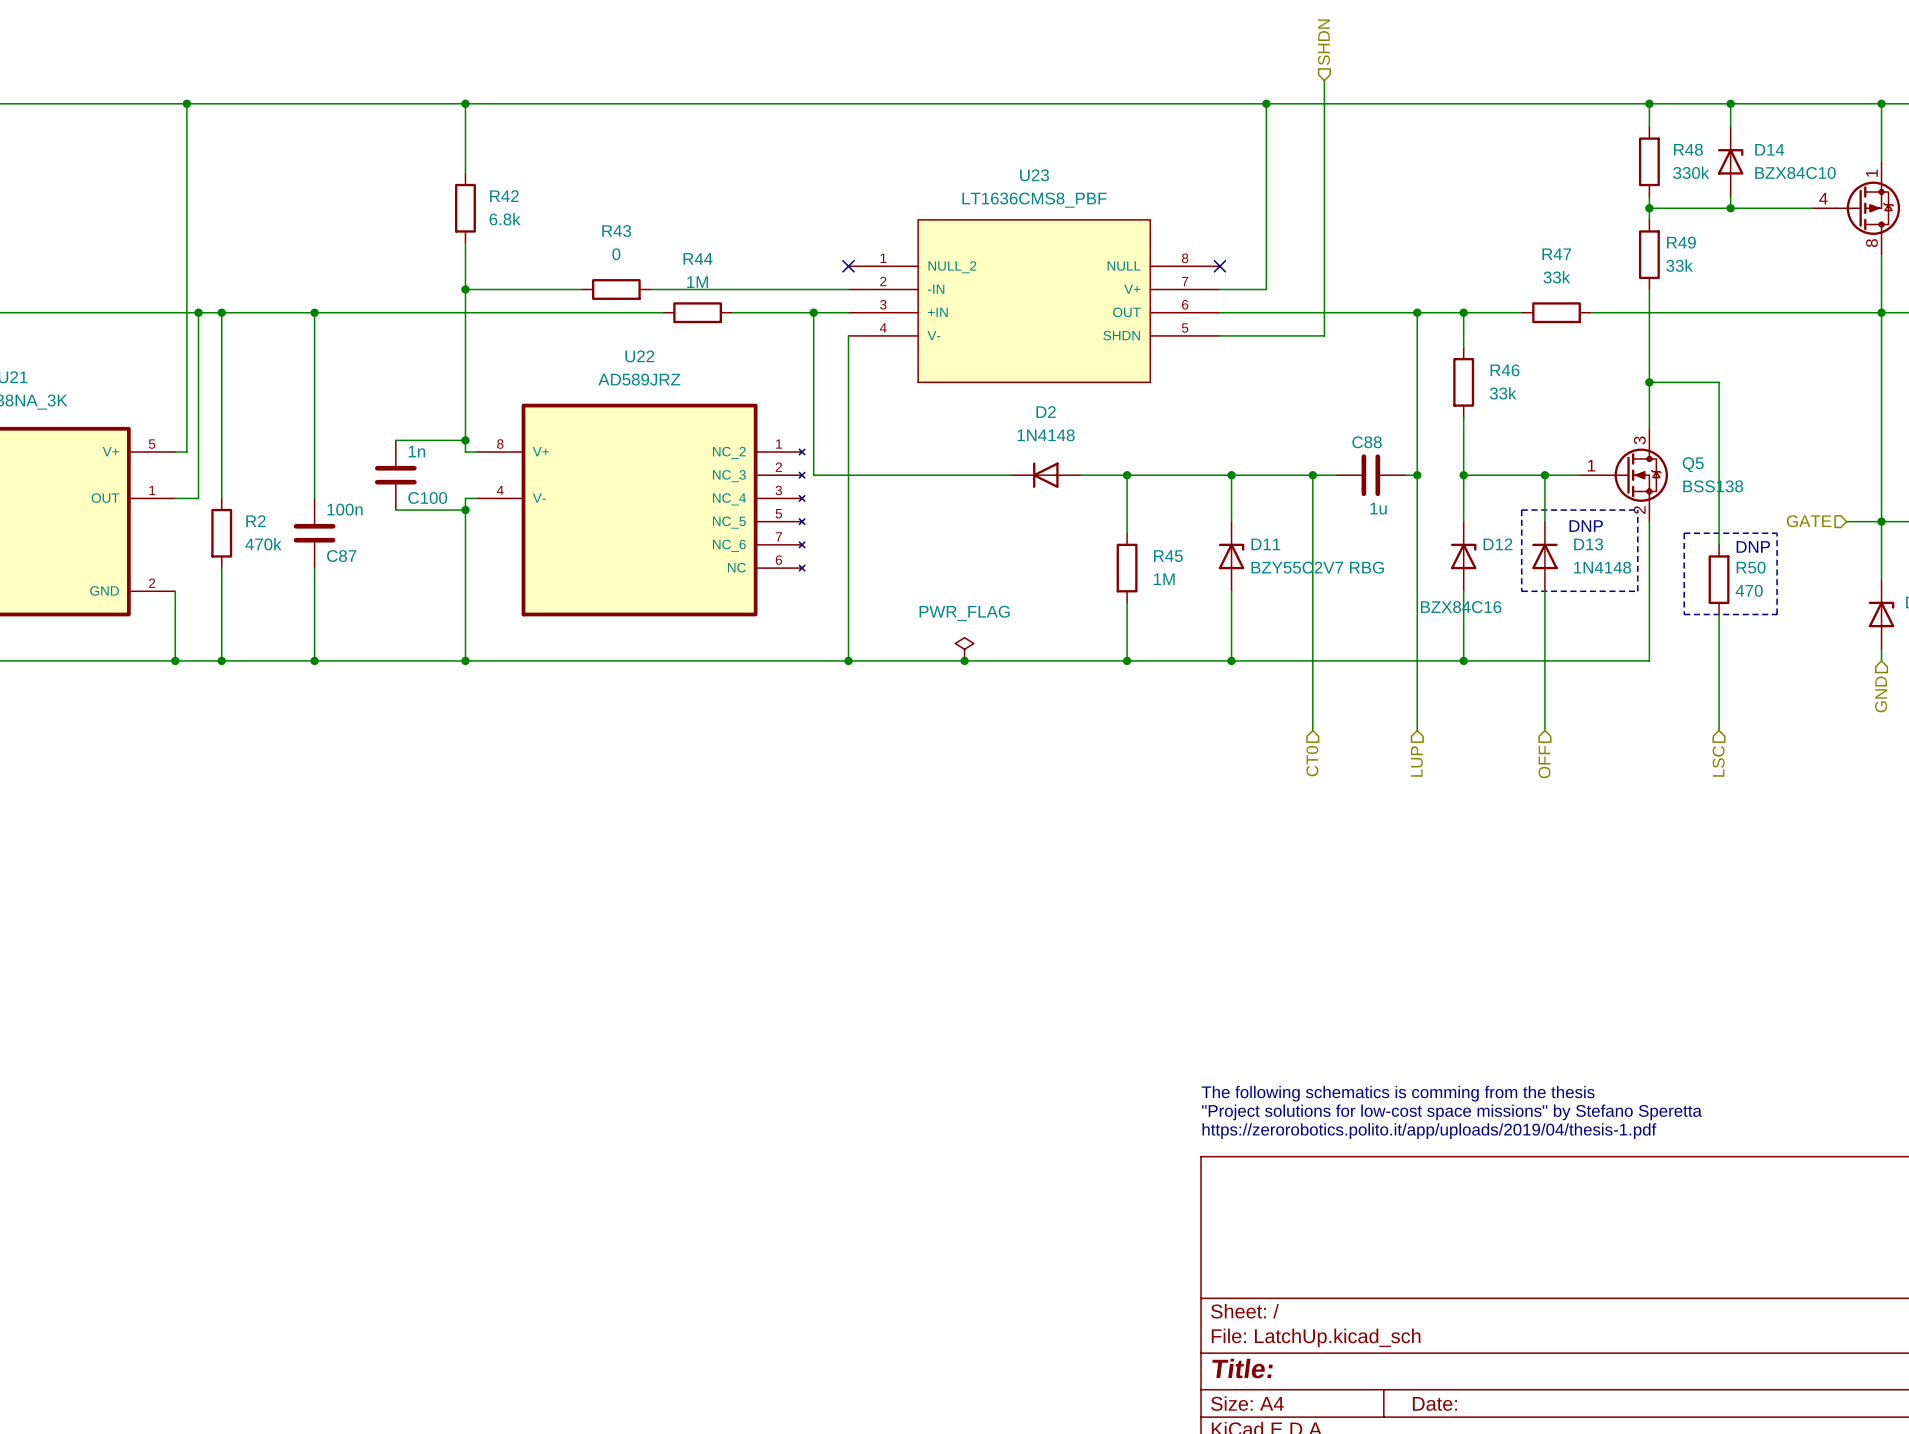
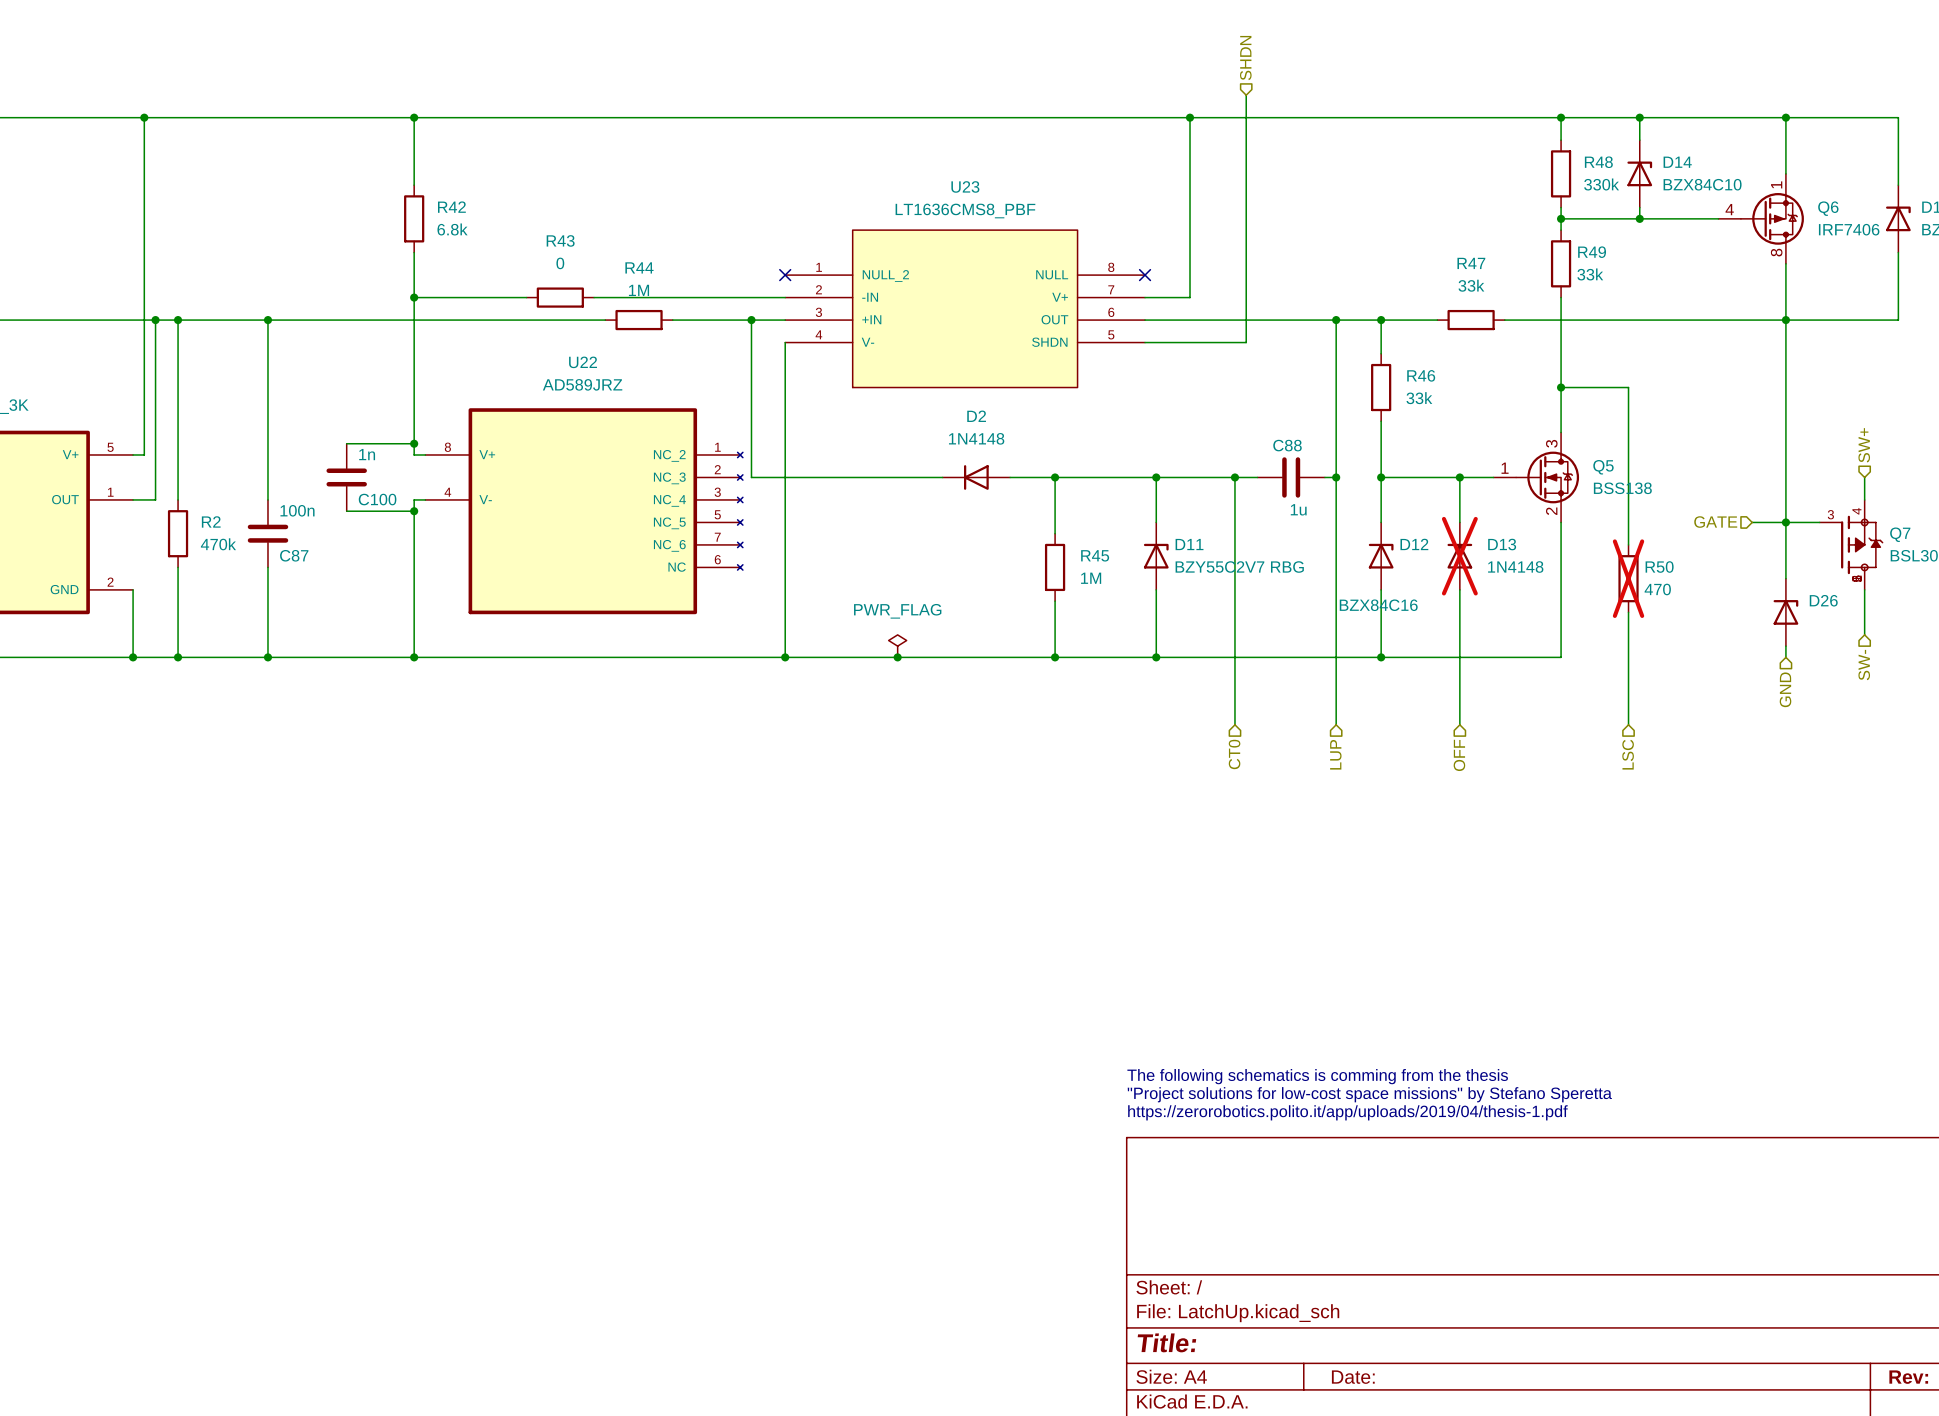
line: (1521, 510) (1521, 591) (1637, 591) (1637, 510) (1521, 510) -> none
text: DNP (1586, 526) -> none
line: (1684, 533) (1777, 533) (1777, 614) (1684, 614) (1684, 533) -> none
text: DNP (1753, 546) -> none
D13 do-not-place cross: none -> (1459, 556)
R50 do-not-place cross: none -> (1628, 578)

